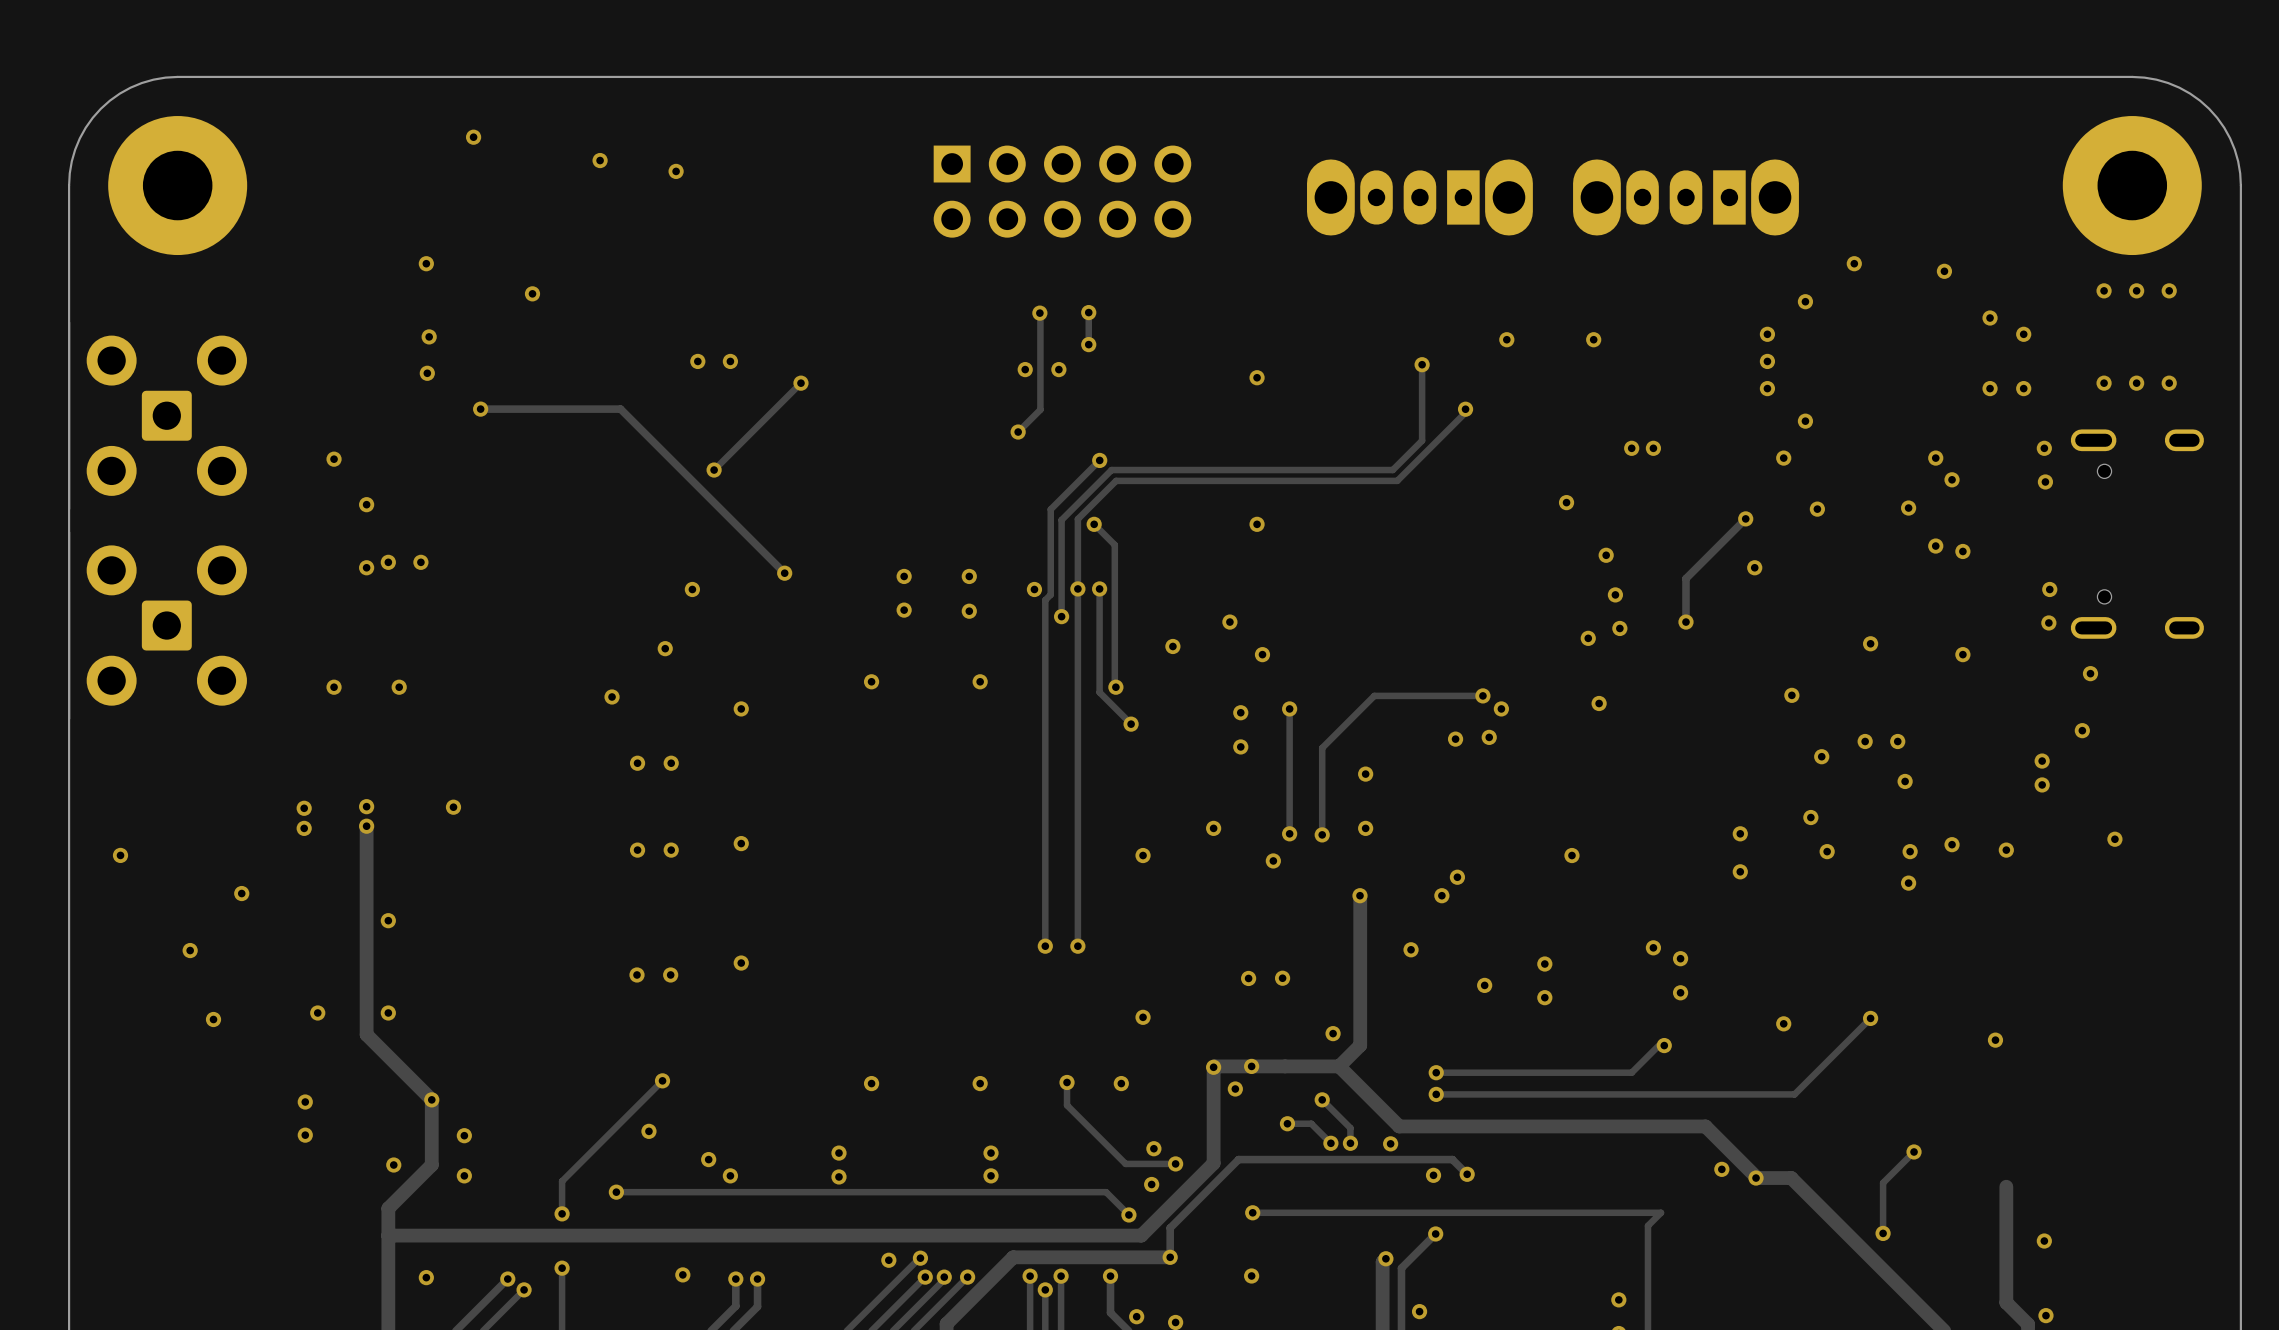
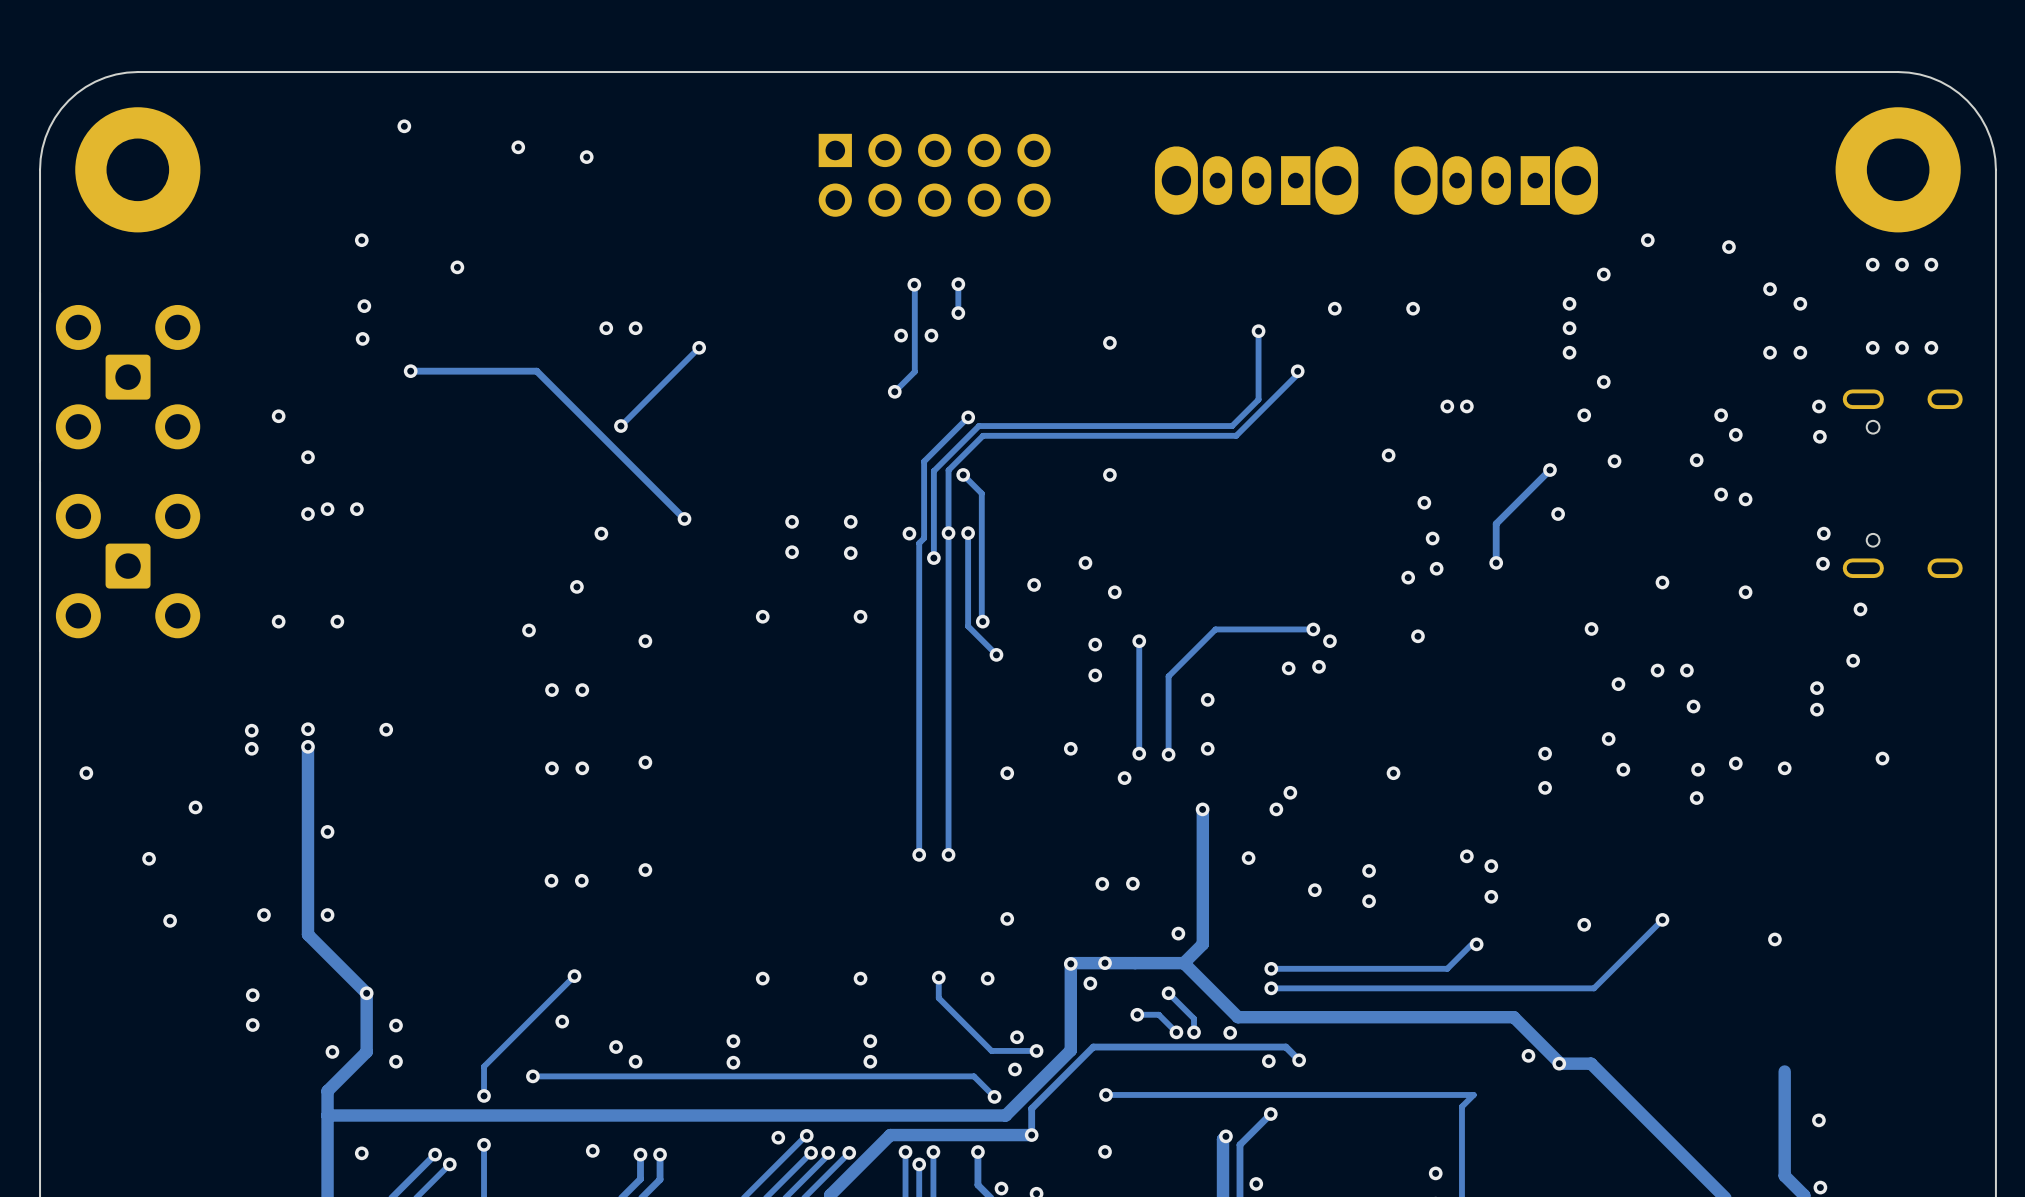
track: (1914, 1151) (1883, 1182) (1883, 1233) -> none
via: (1914, 1151) -> none
via: (1883, 1233) -> none

